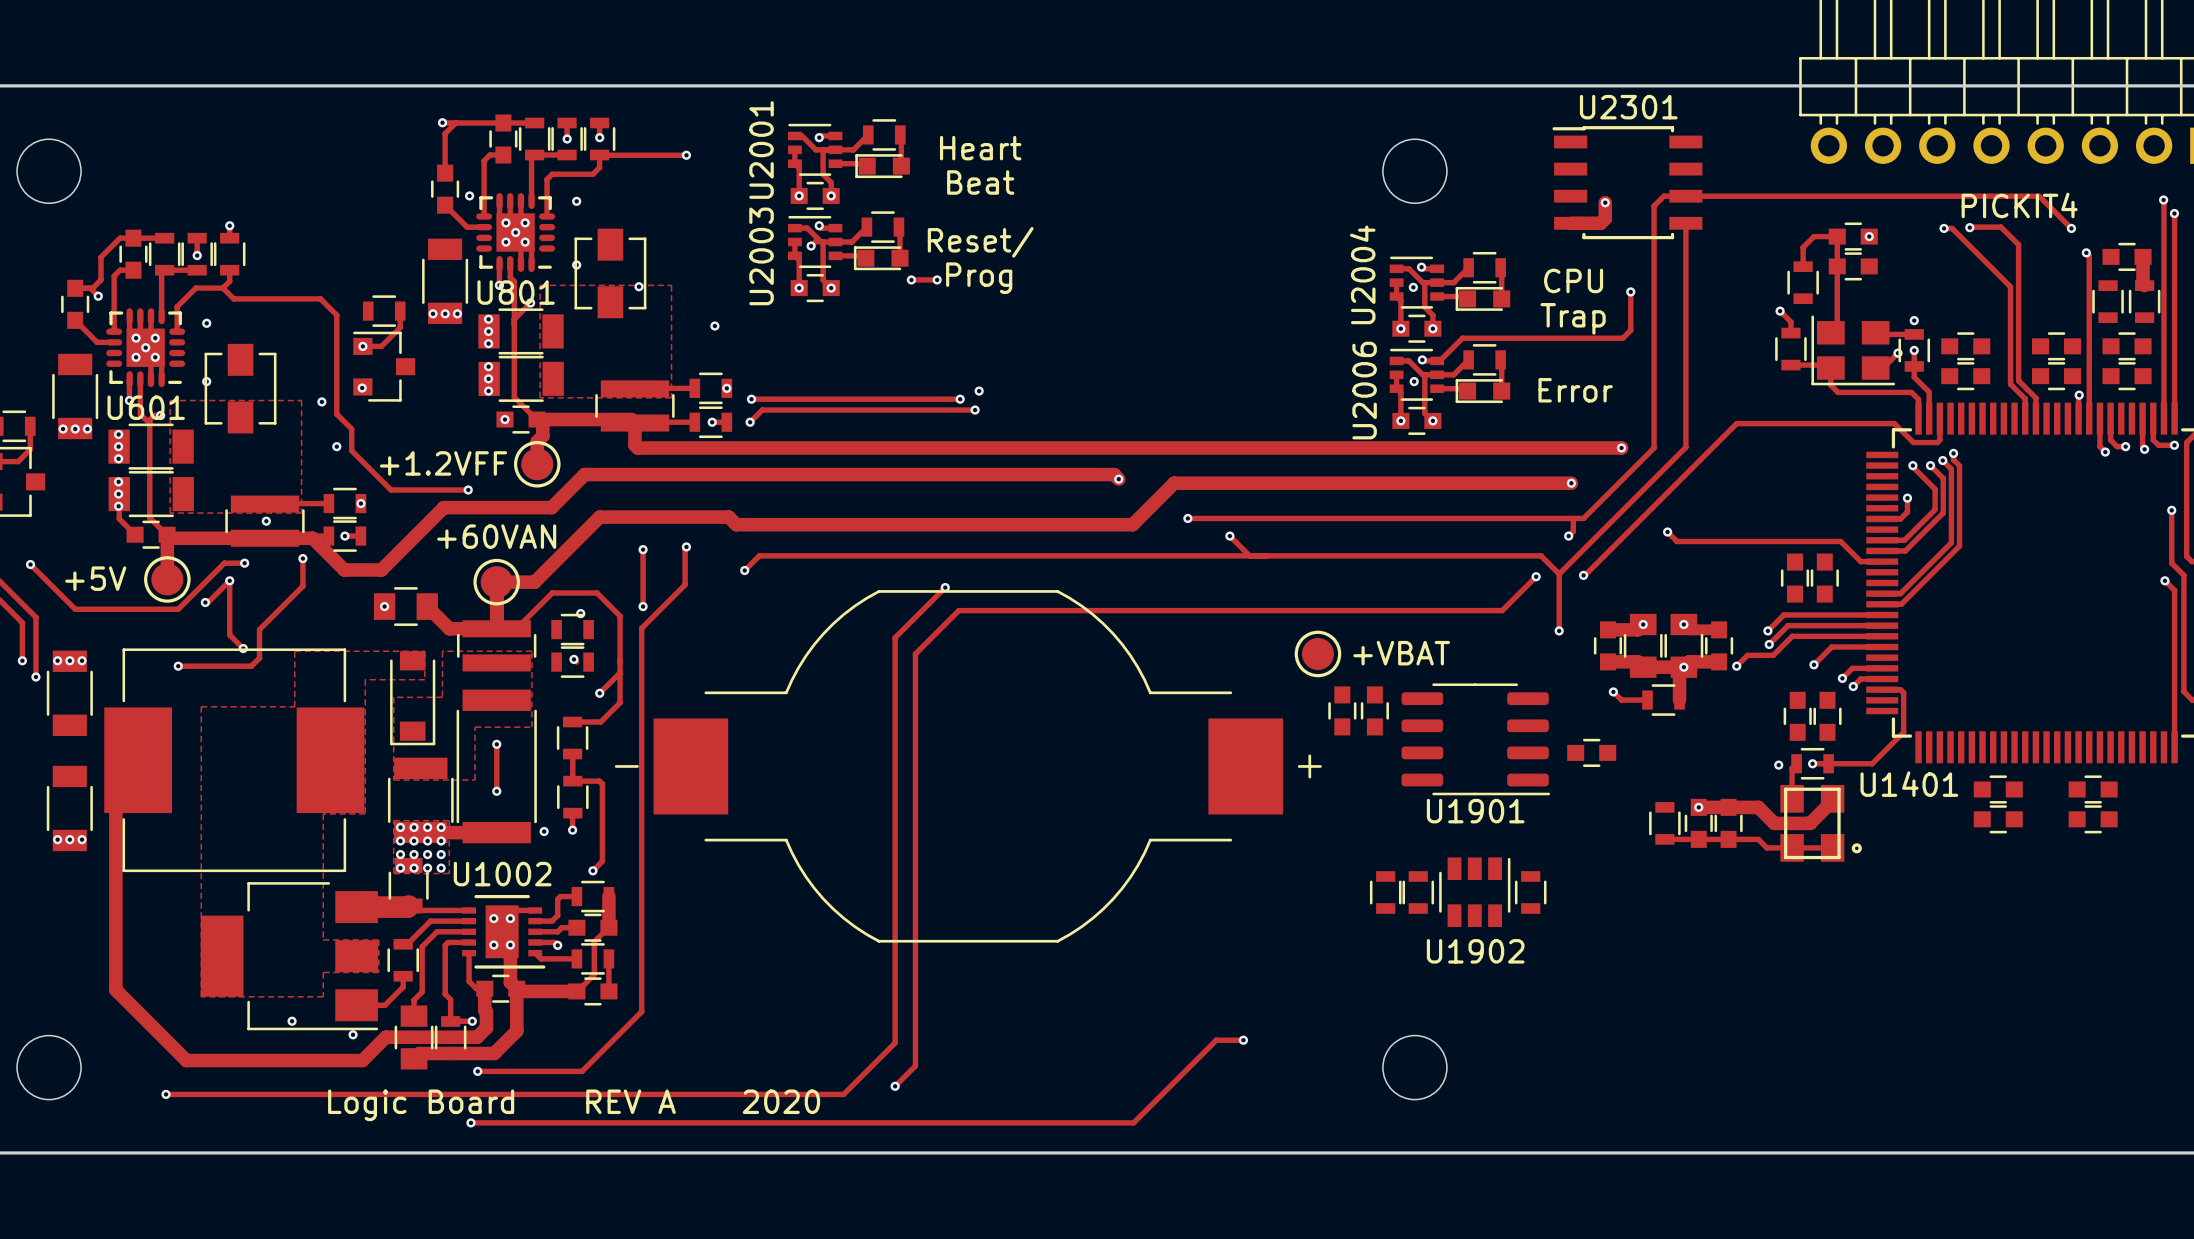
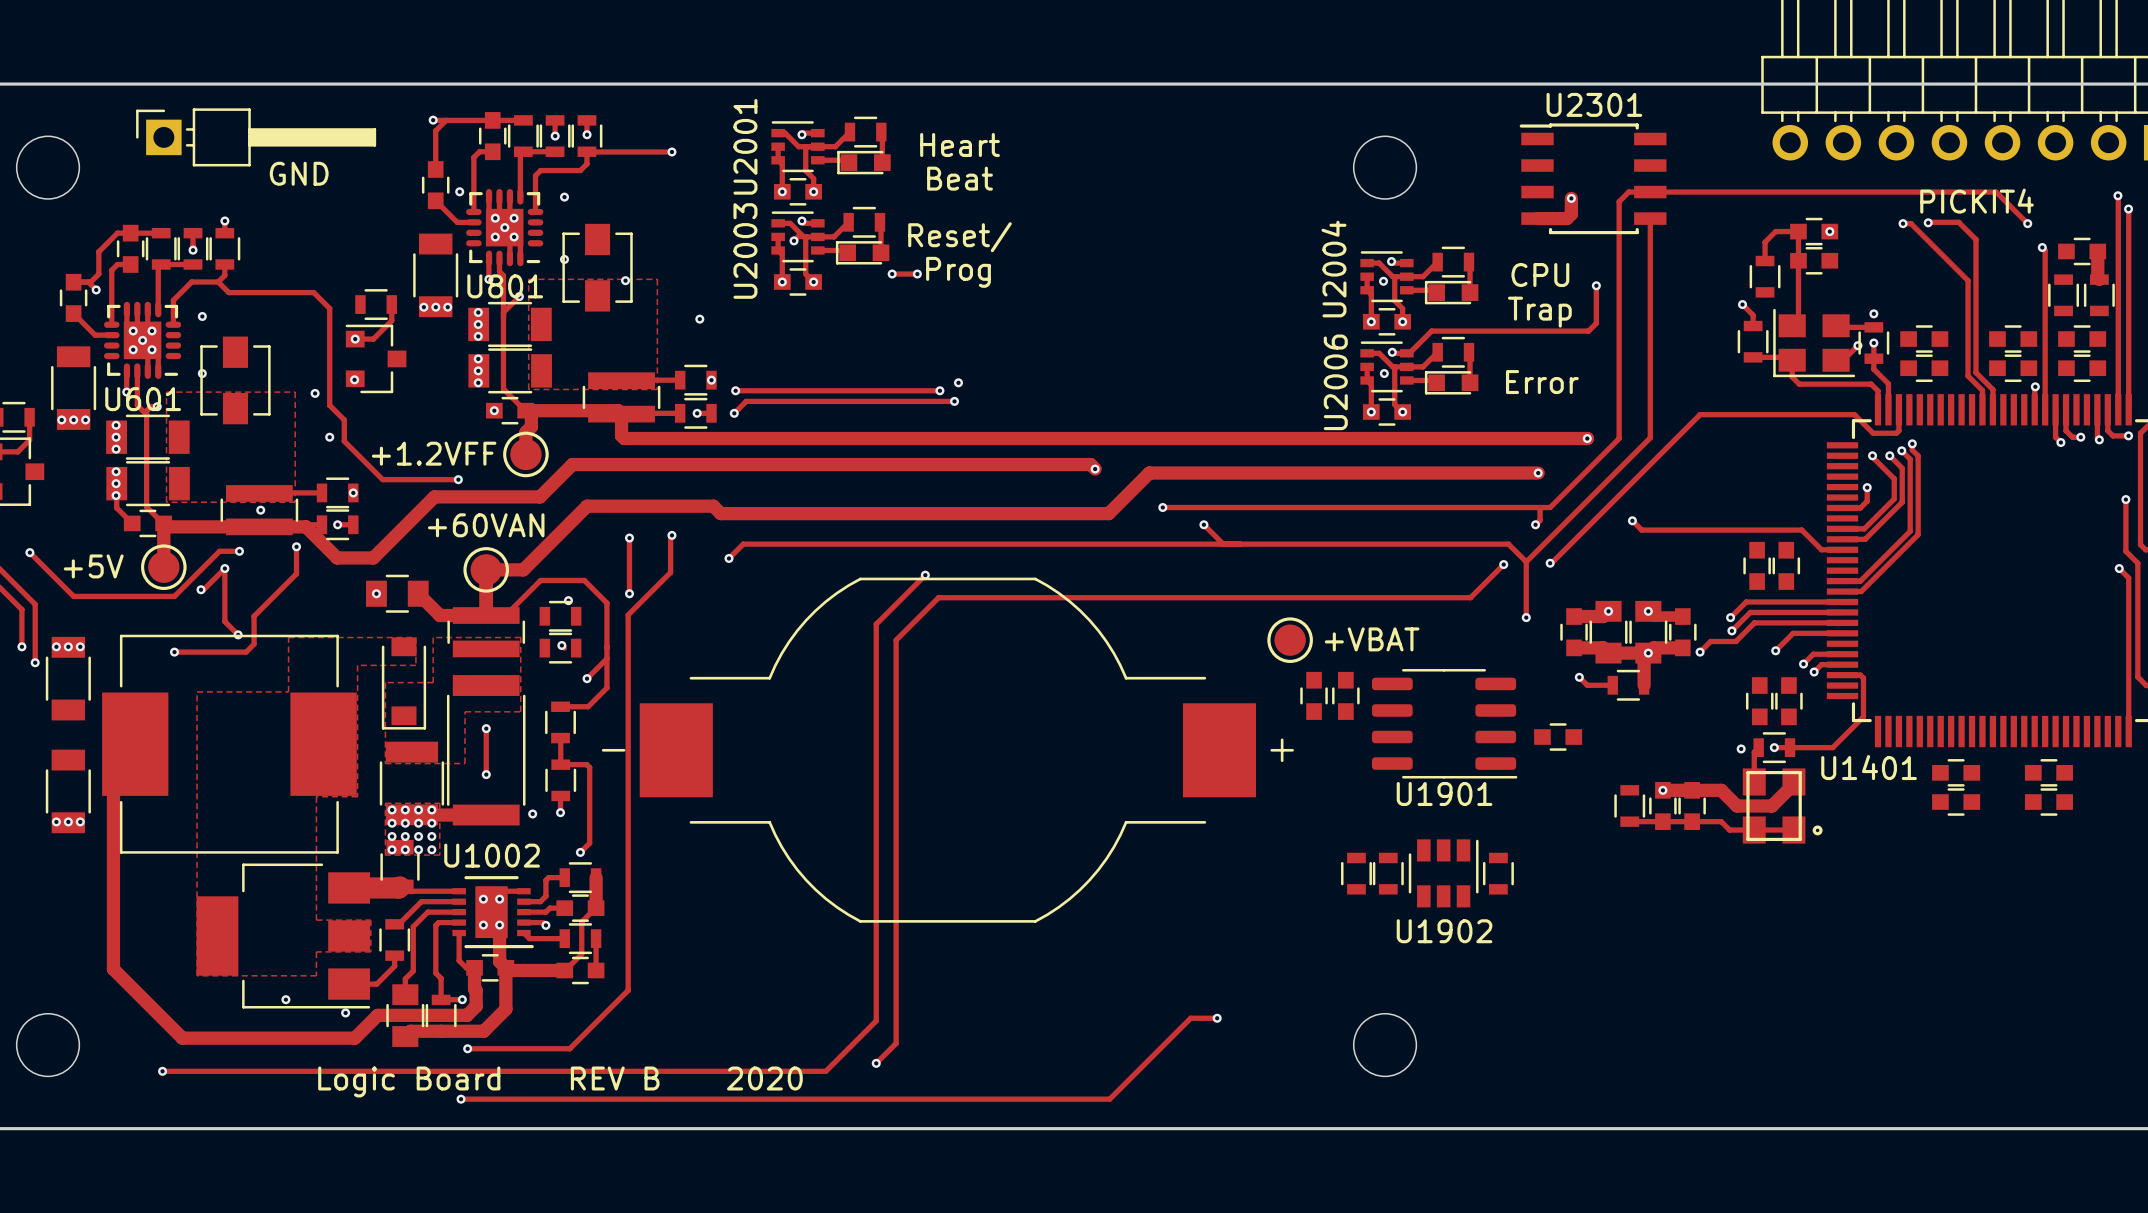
part: none -> (256, 137)
text: none -> GND (299, 173)
text: Logic Board REV A 2020 (574, 1105) -> Logic Board REV B 2020 (560, 1081)

